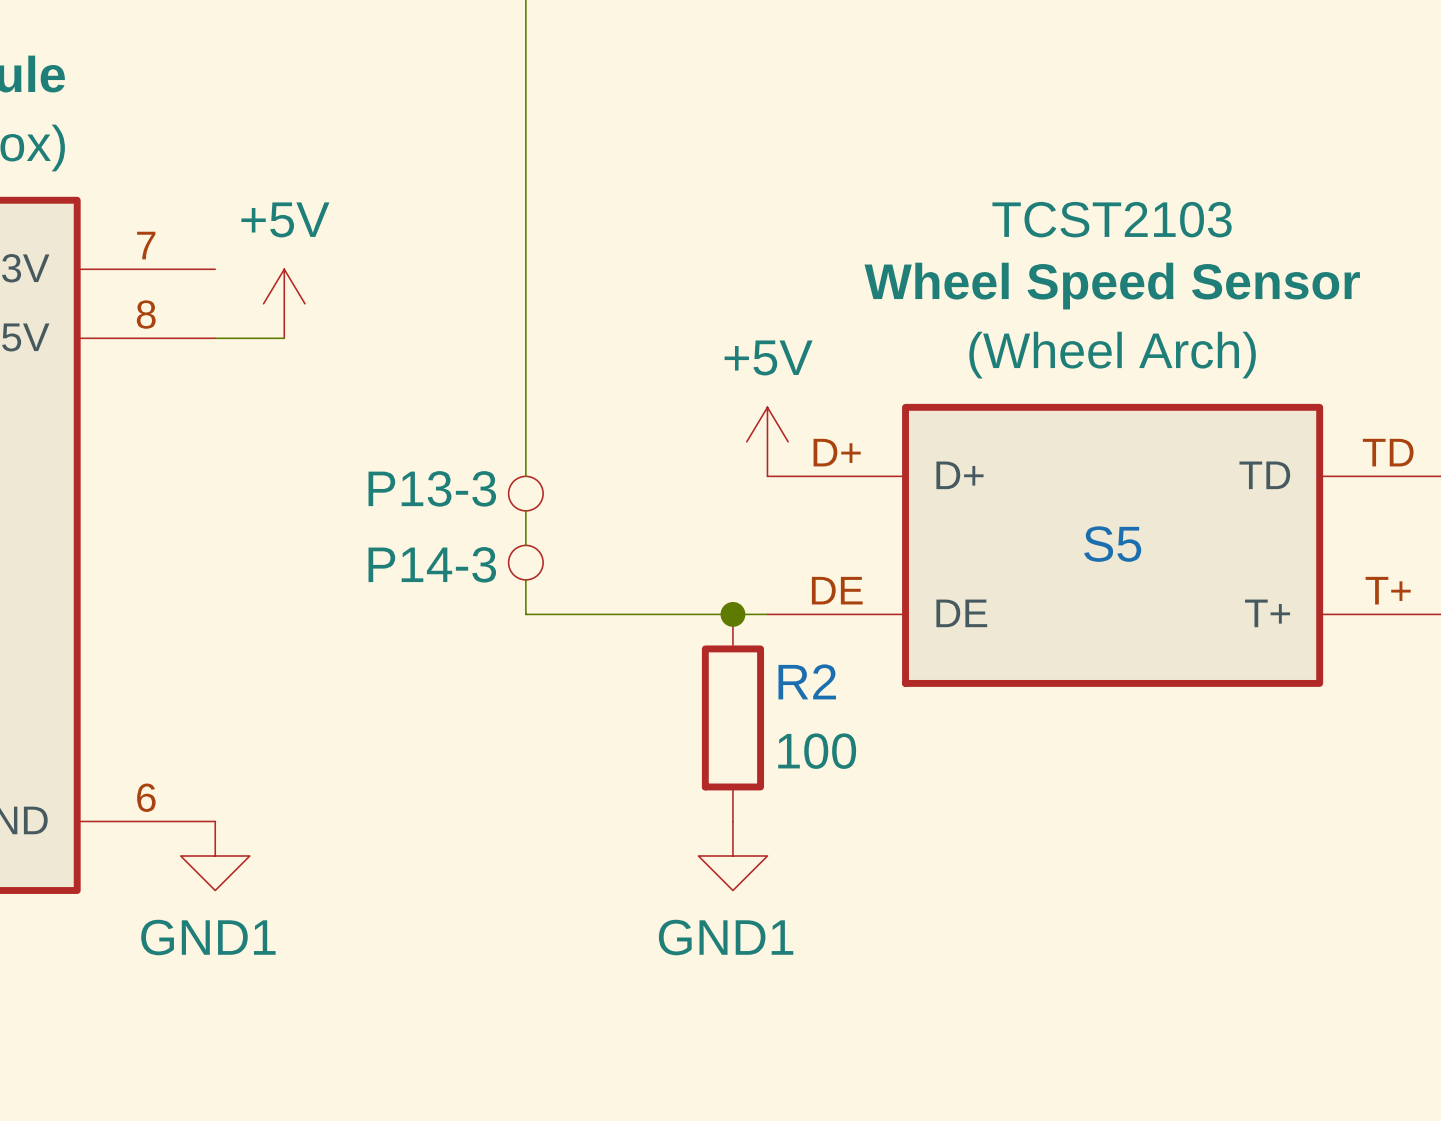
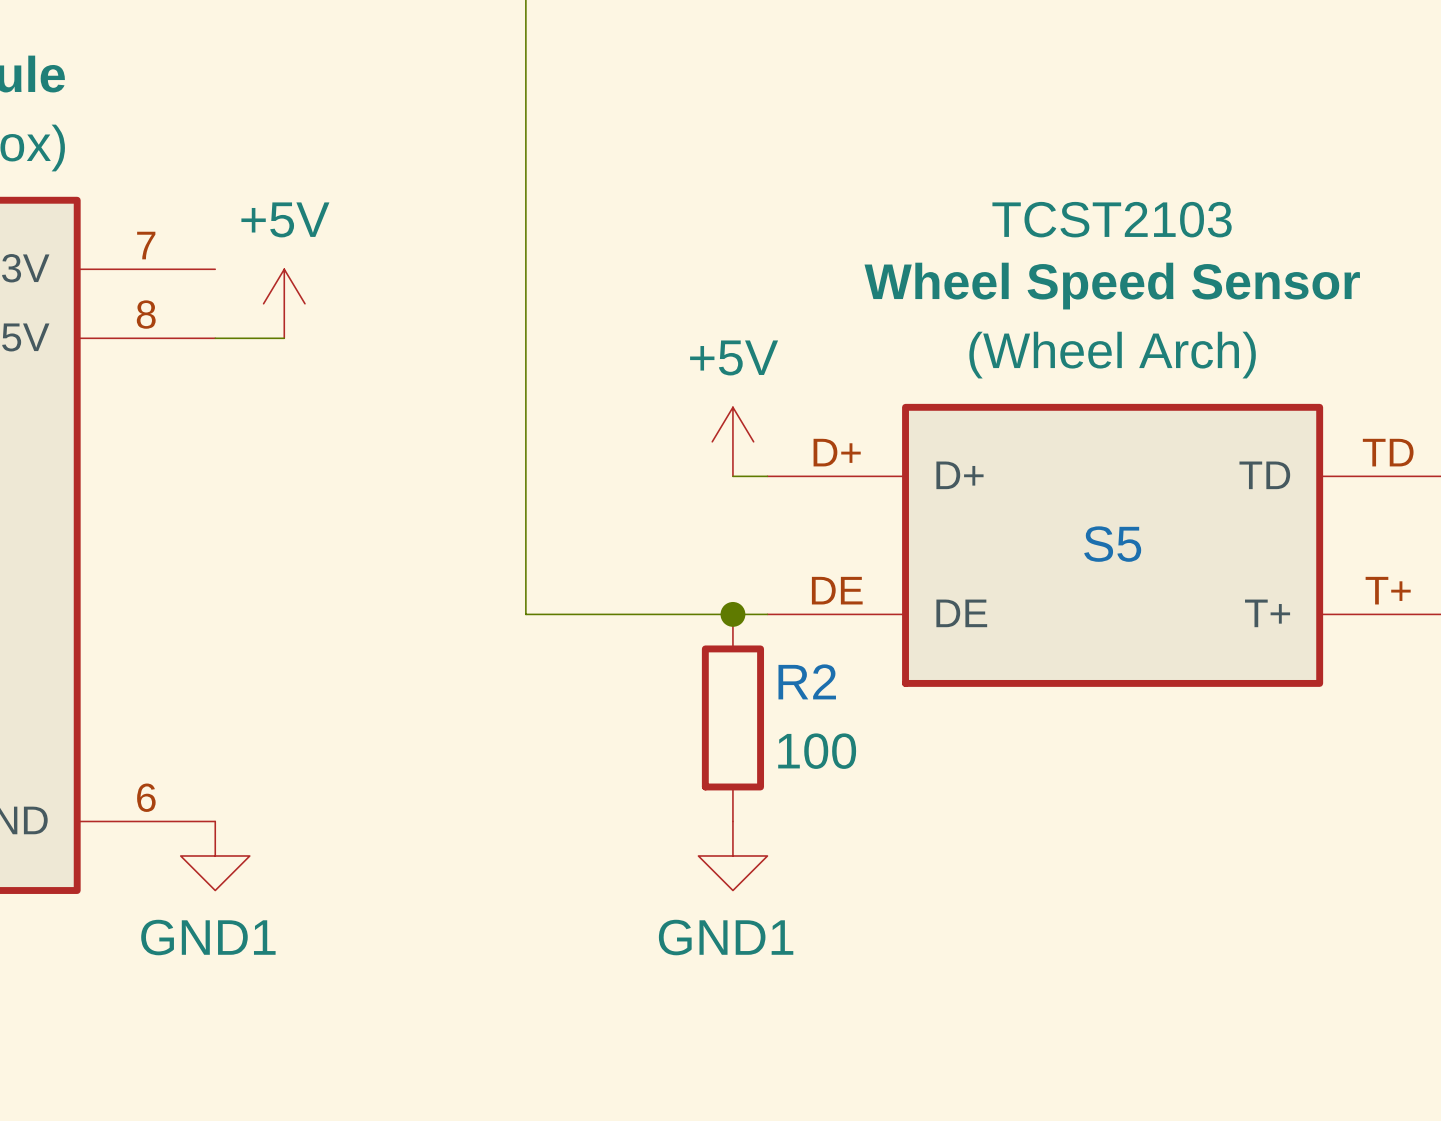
power symbol position: +5V (767, 441) -> +5V (732, 441)
wire: none -> (525, 476) (525, 510)
wire: none -> (732, 476) (767, 476)
part: P13-3 (525, 493) -> none
wire: none -> (525, 545) (525, 579)
part: P14-3 (525, 562) -> none

